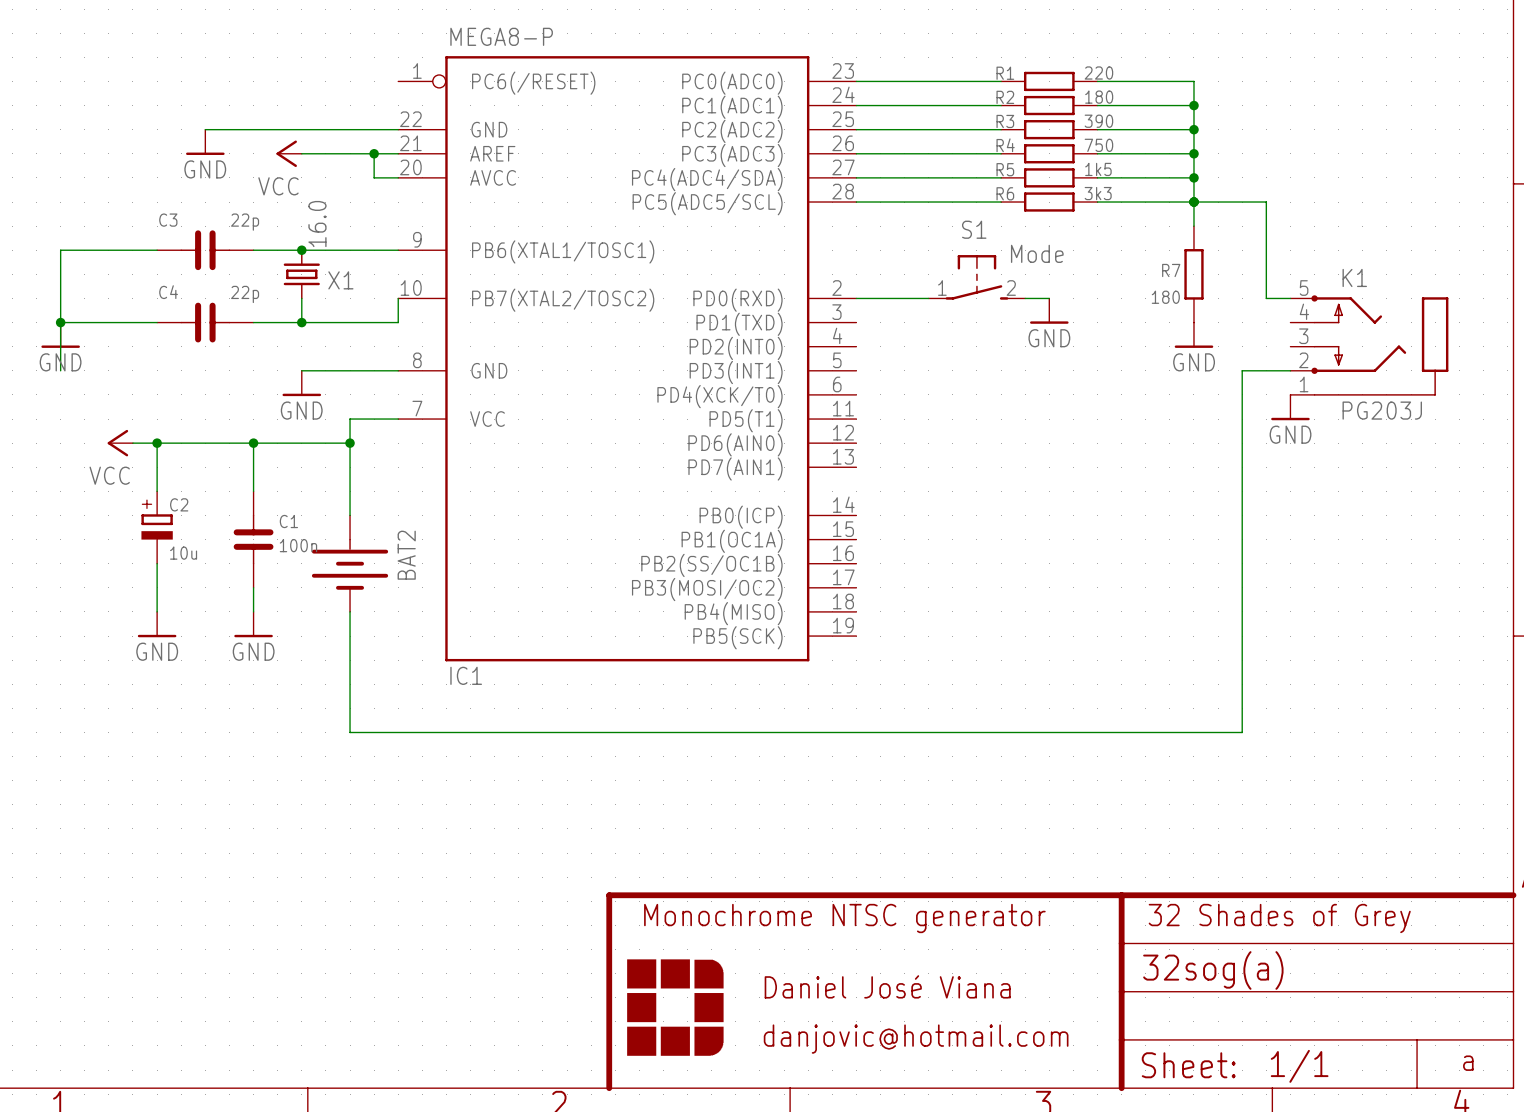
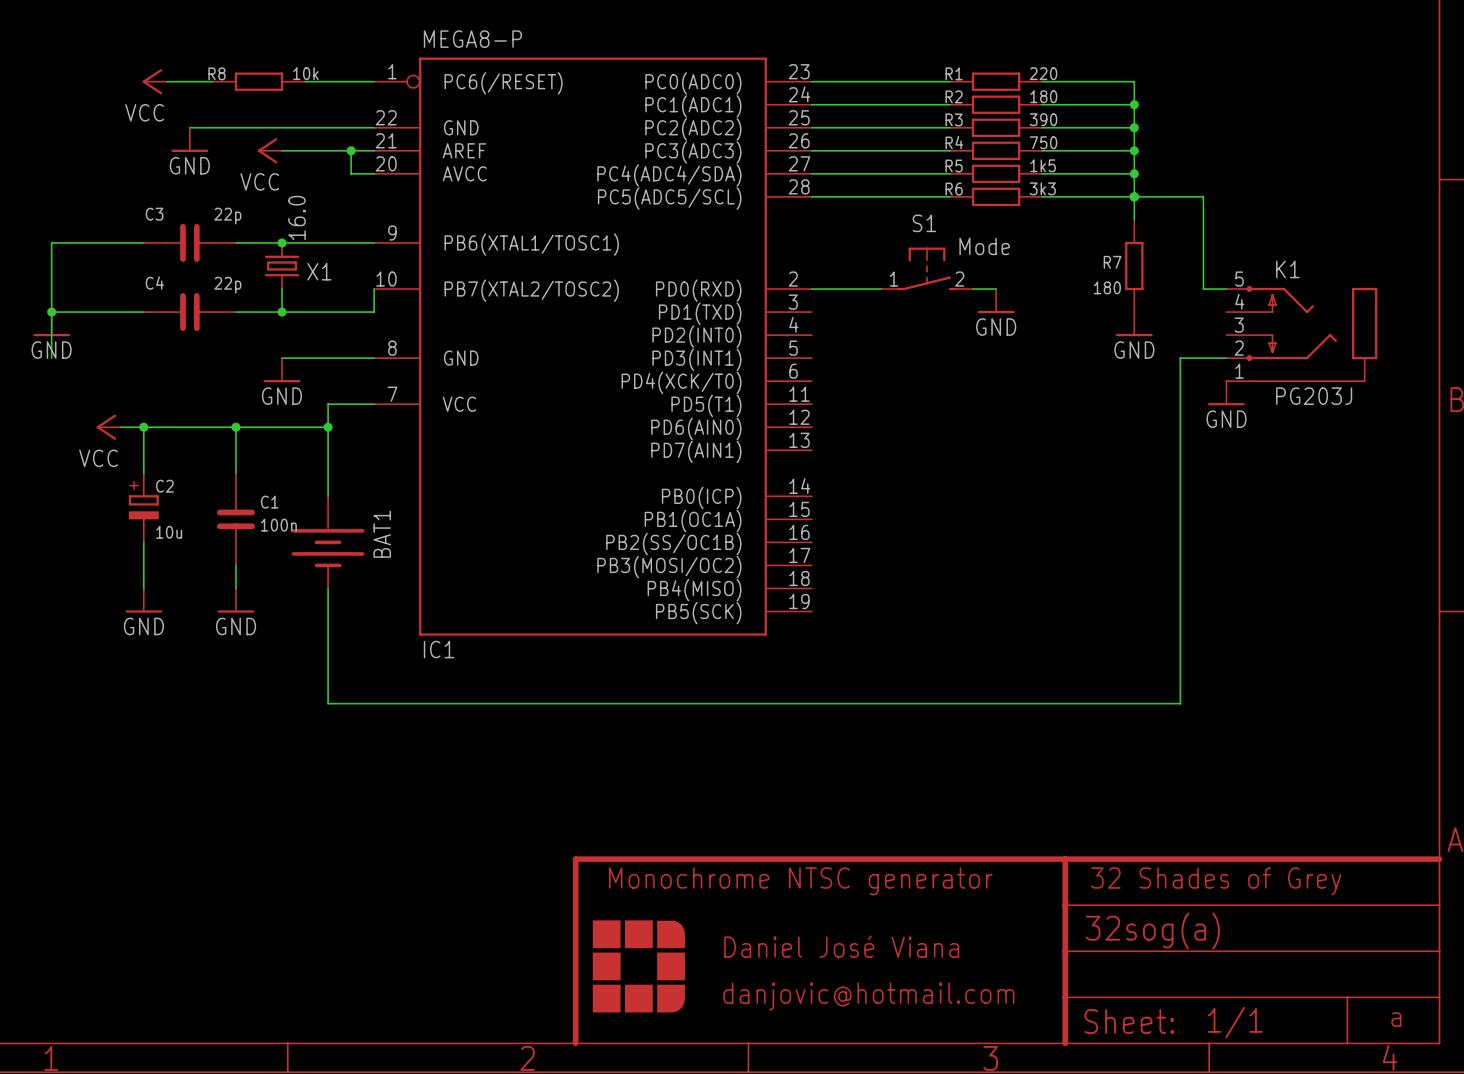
power symbol: none -> VCC (154, 81)
wire: none -> (166, 81) (212, 81)
R8: none -> 10k (258, 81)
wire: none -> (305, 81) (374, 81)
BAT2 name: BAT2 (406, 555) -> BAT1 (382, 534)

